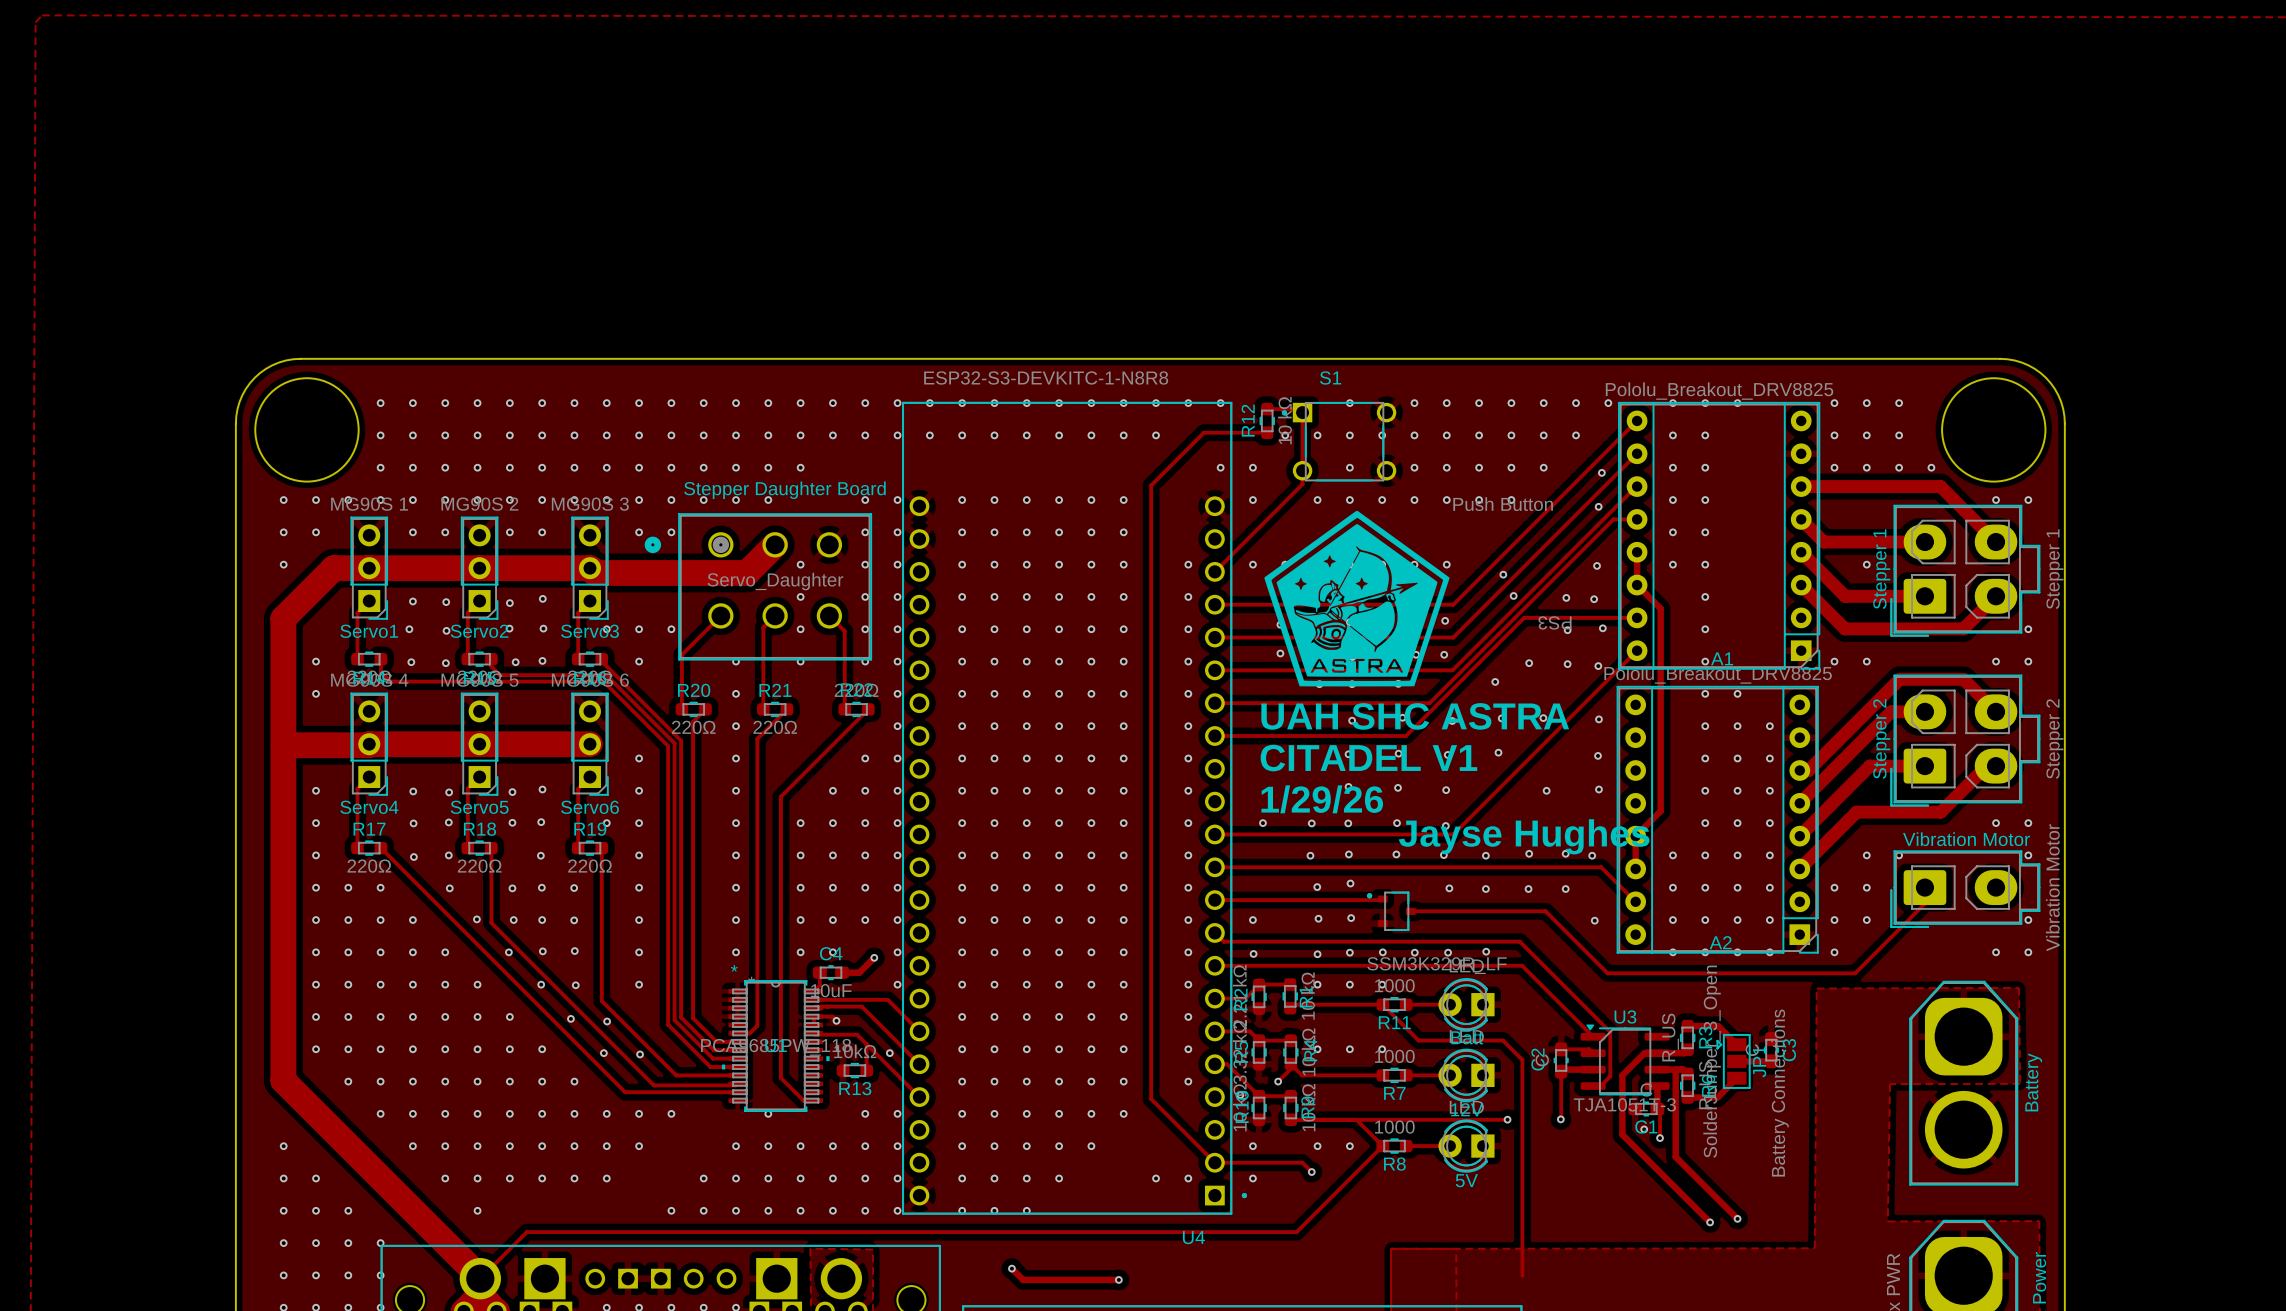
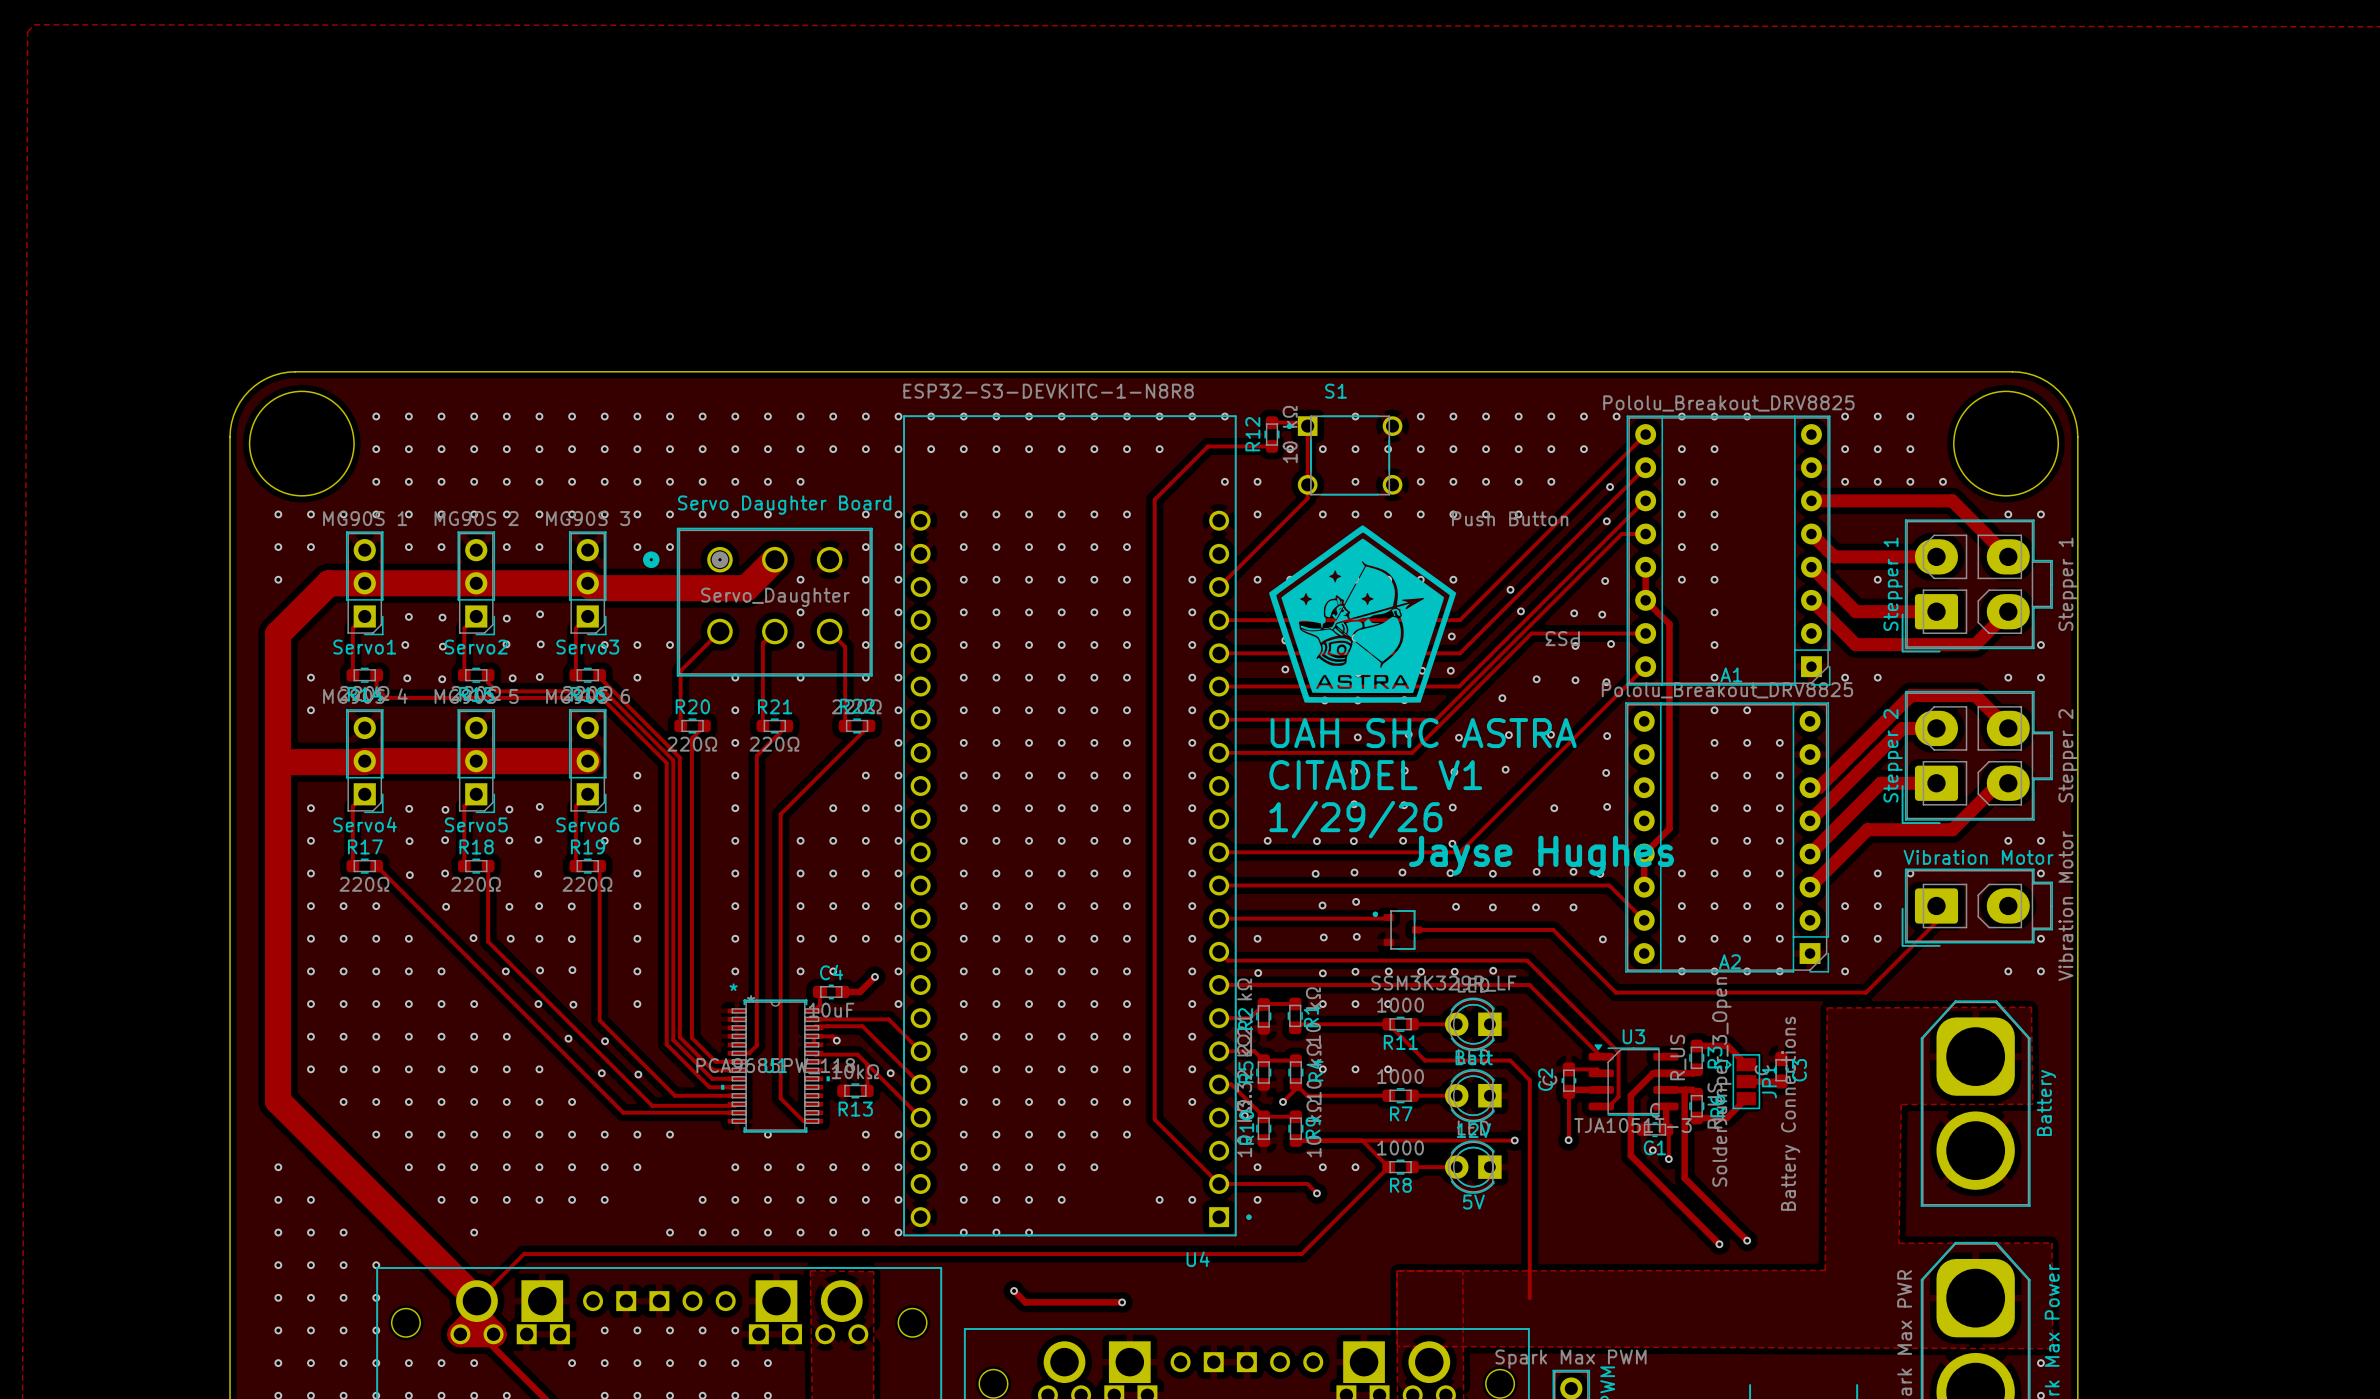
Stepper Daughter Board name: Stepper Daughter Board (784, 490) -> Servo Daughter Board (784, 505)

